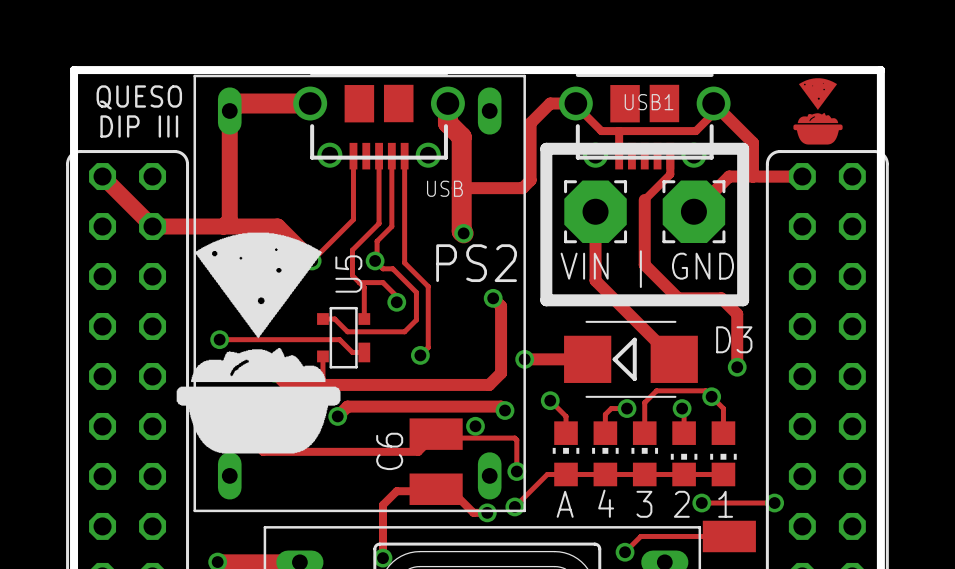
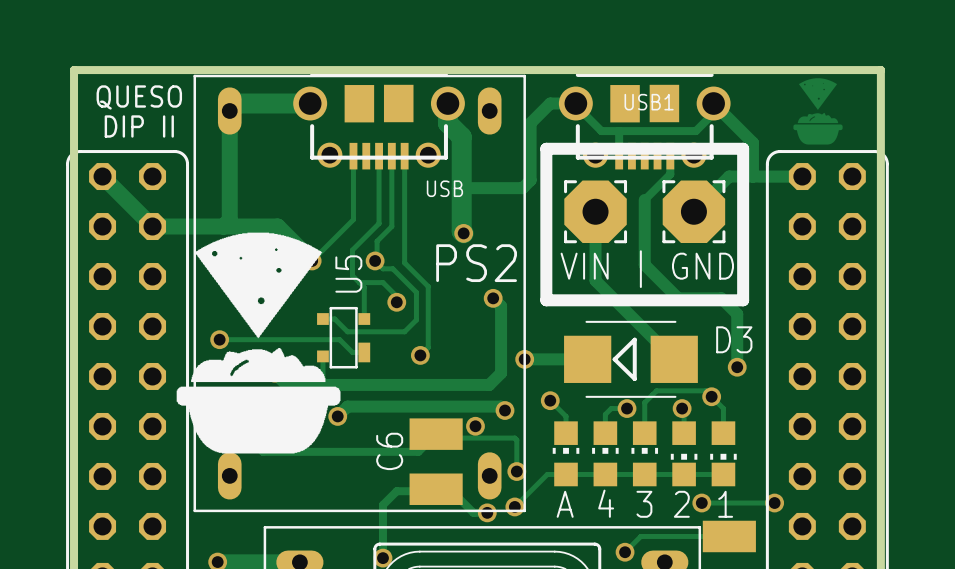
text: DIP III (139, 126) -> DIP II (139, 126)

